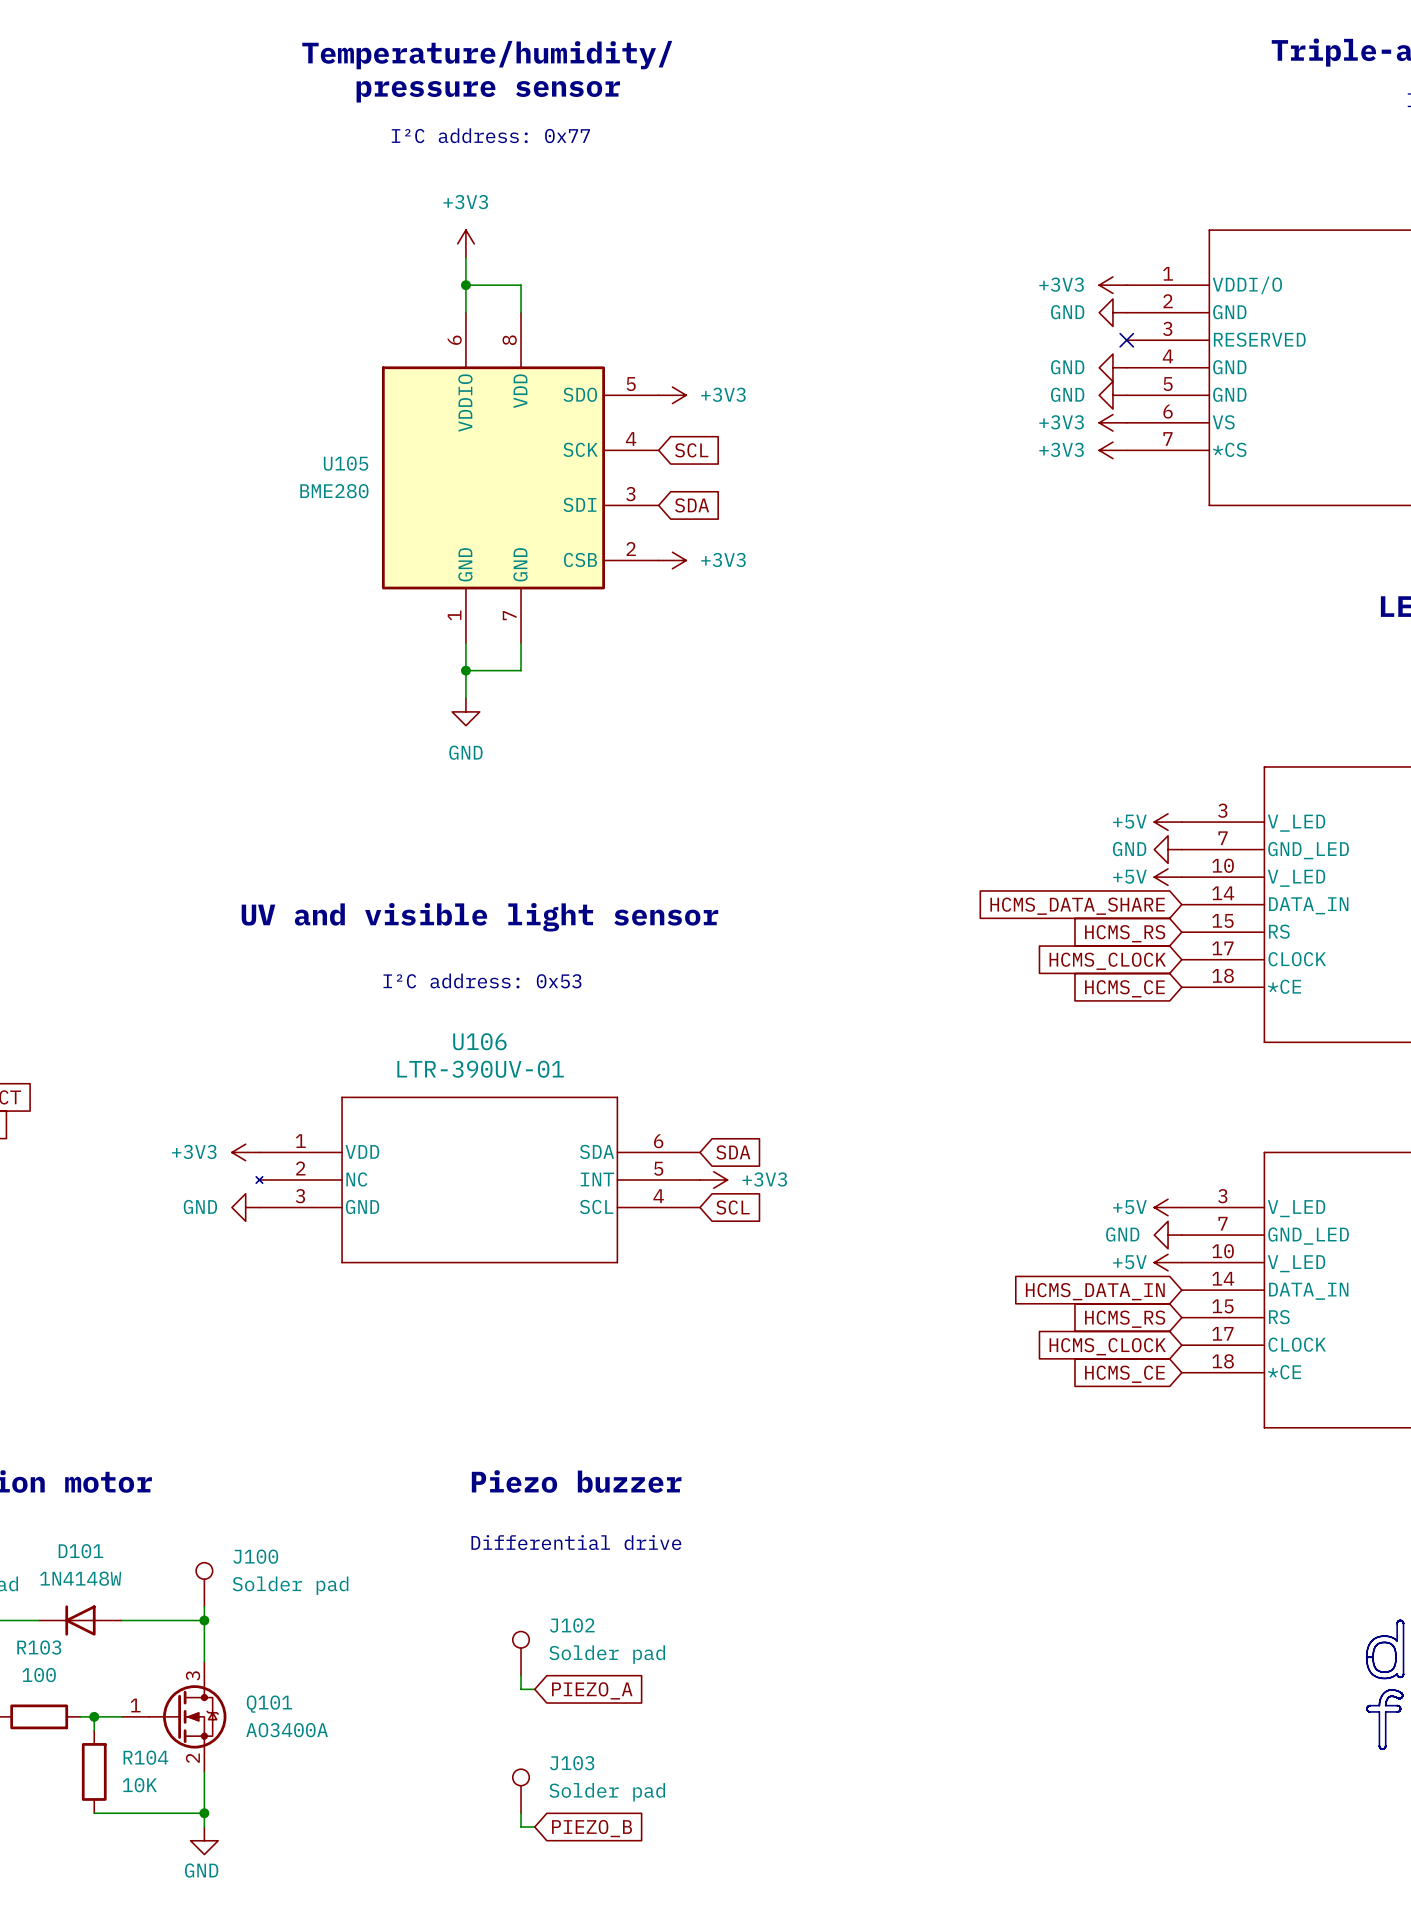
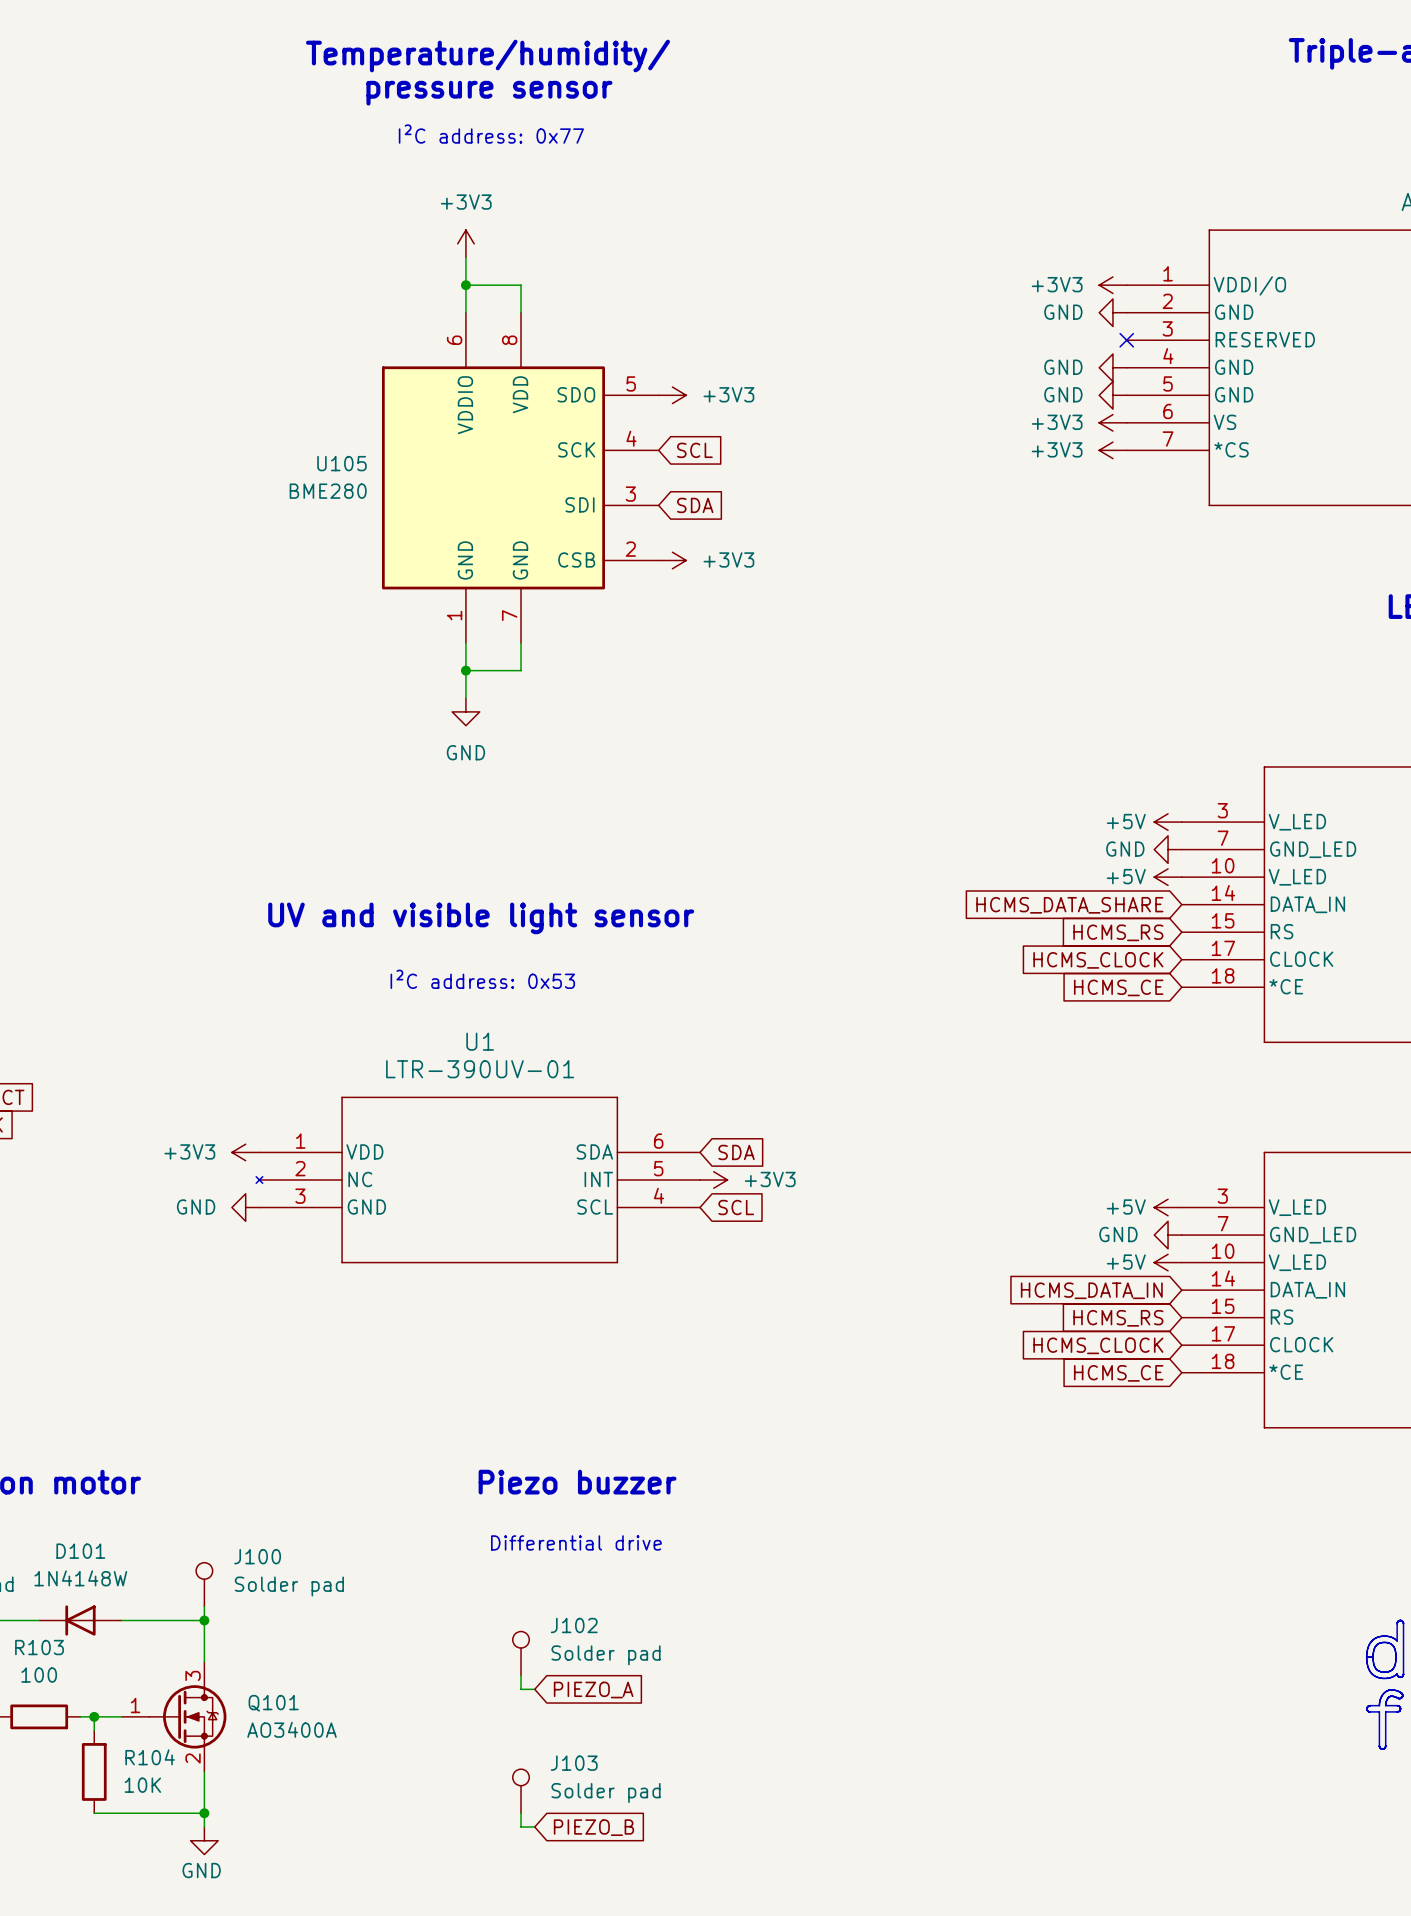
U106 name: U106 (479, 1041) -> U1 (480, 1041)

